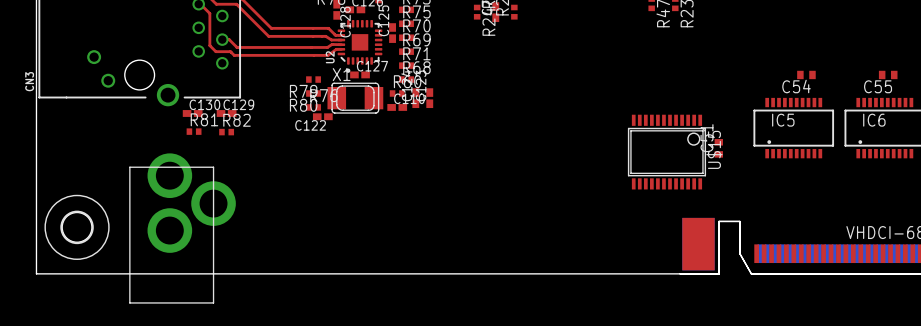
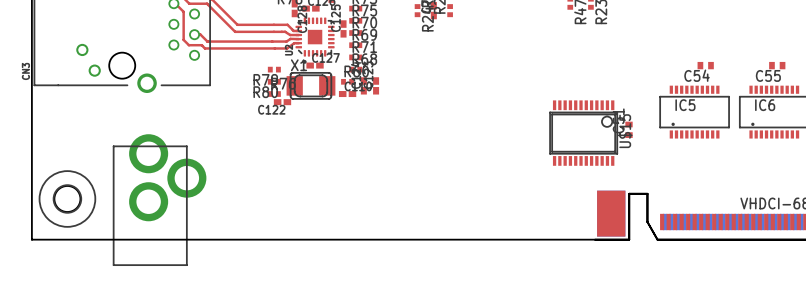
C130: (192, 113) -> none
C129: (226, 113) -> none
R81: (194, 131) -> none
R82: (226, 132) -> none

